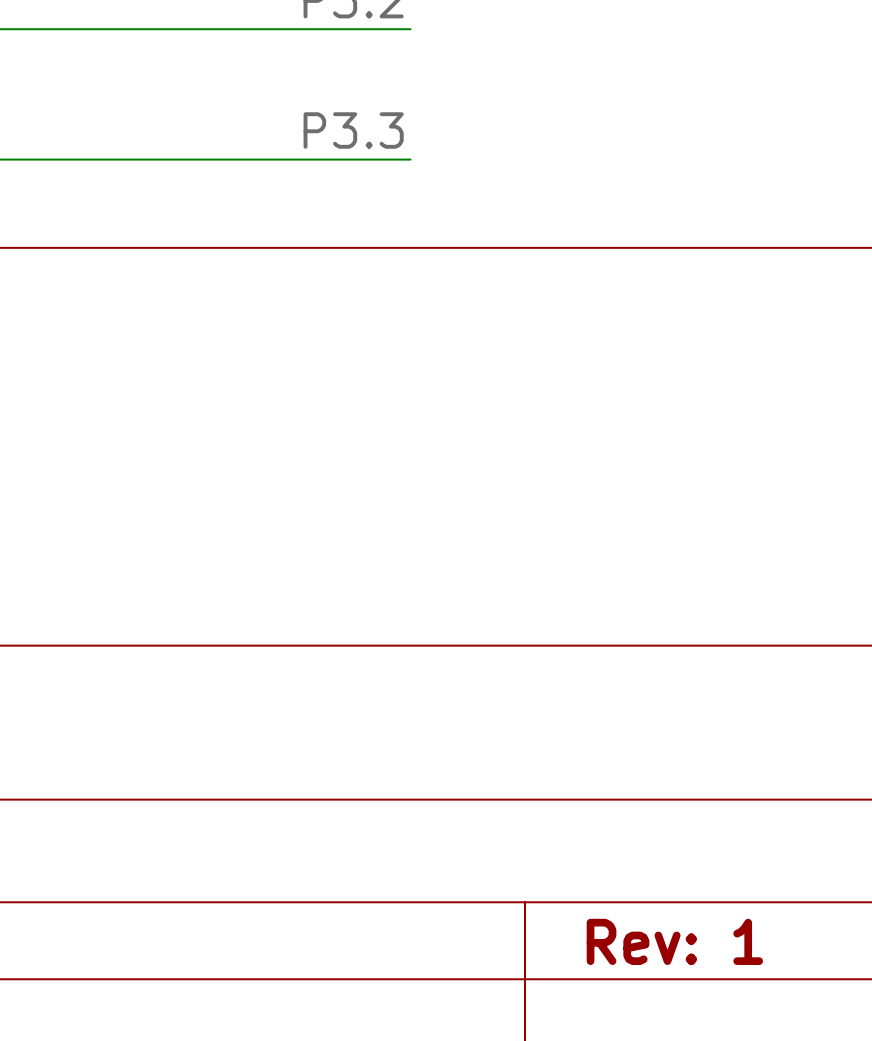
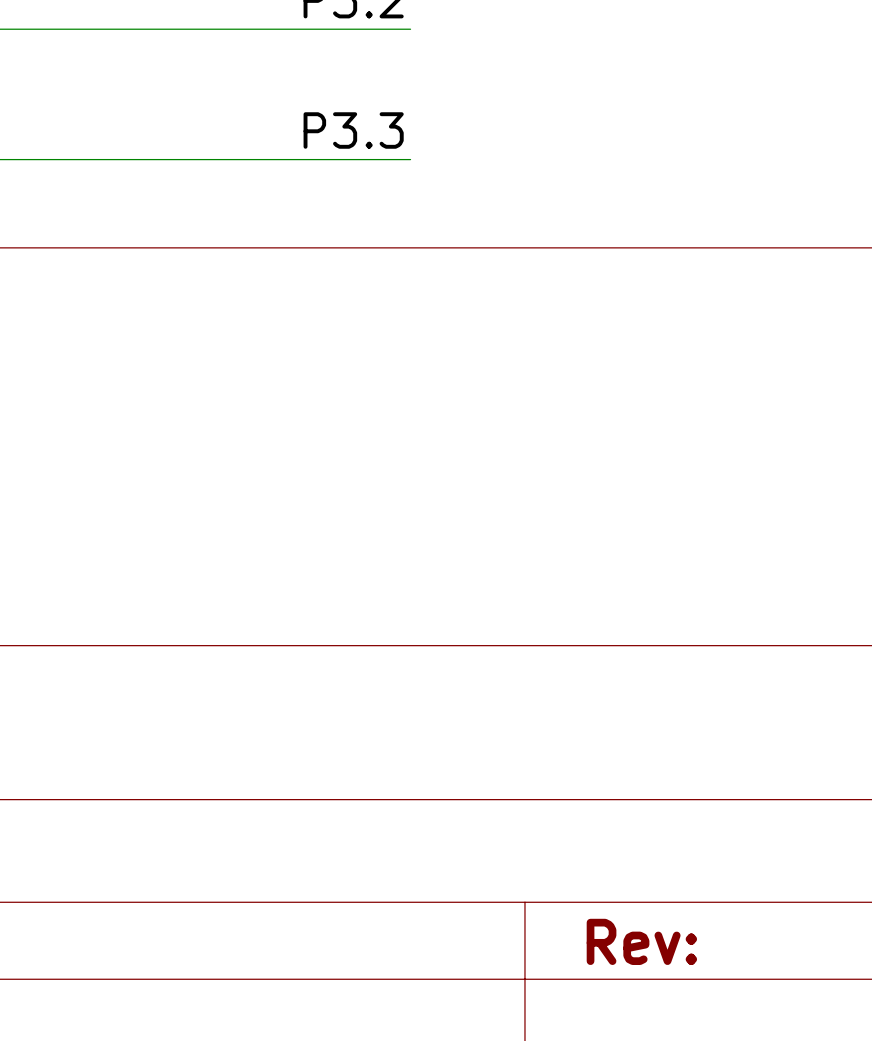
title block: Rev: 1 (674, 941) -> Rev: (641, 941)

